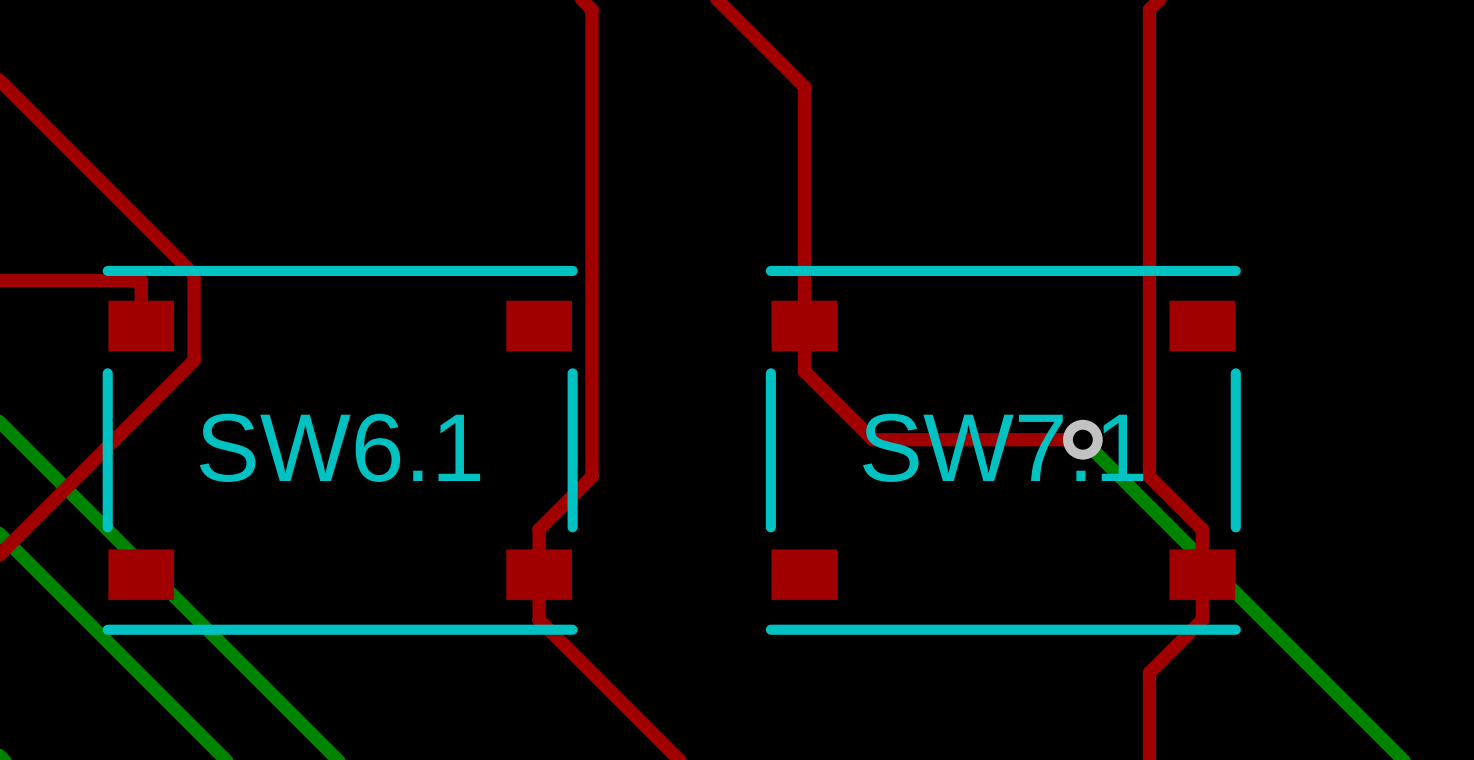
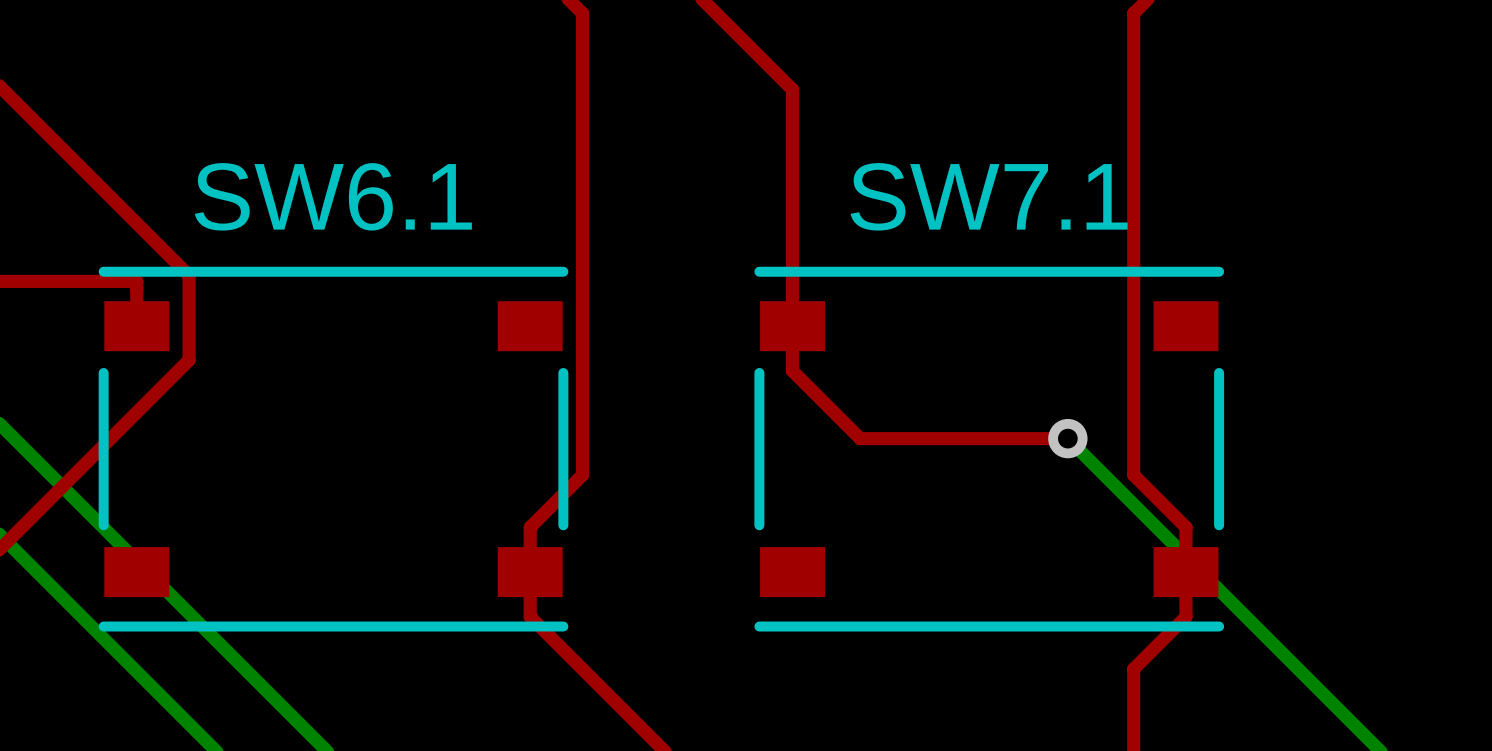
SW6.1 name position: SW6.1 (340, 447) -> SW6.1 (333, 196)
SW7.1 name position: SW7.1 (1003, 447) -> SW7.1 (989, 196)

